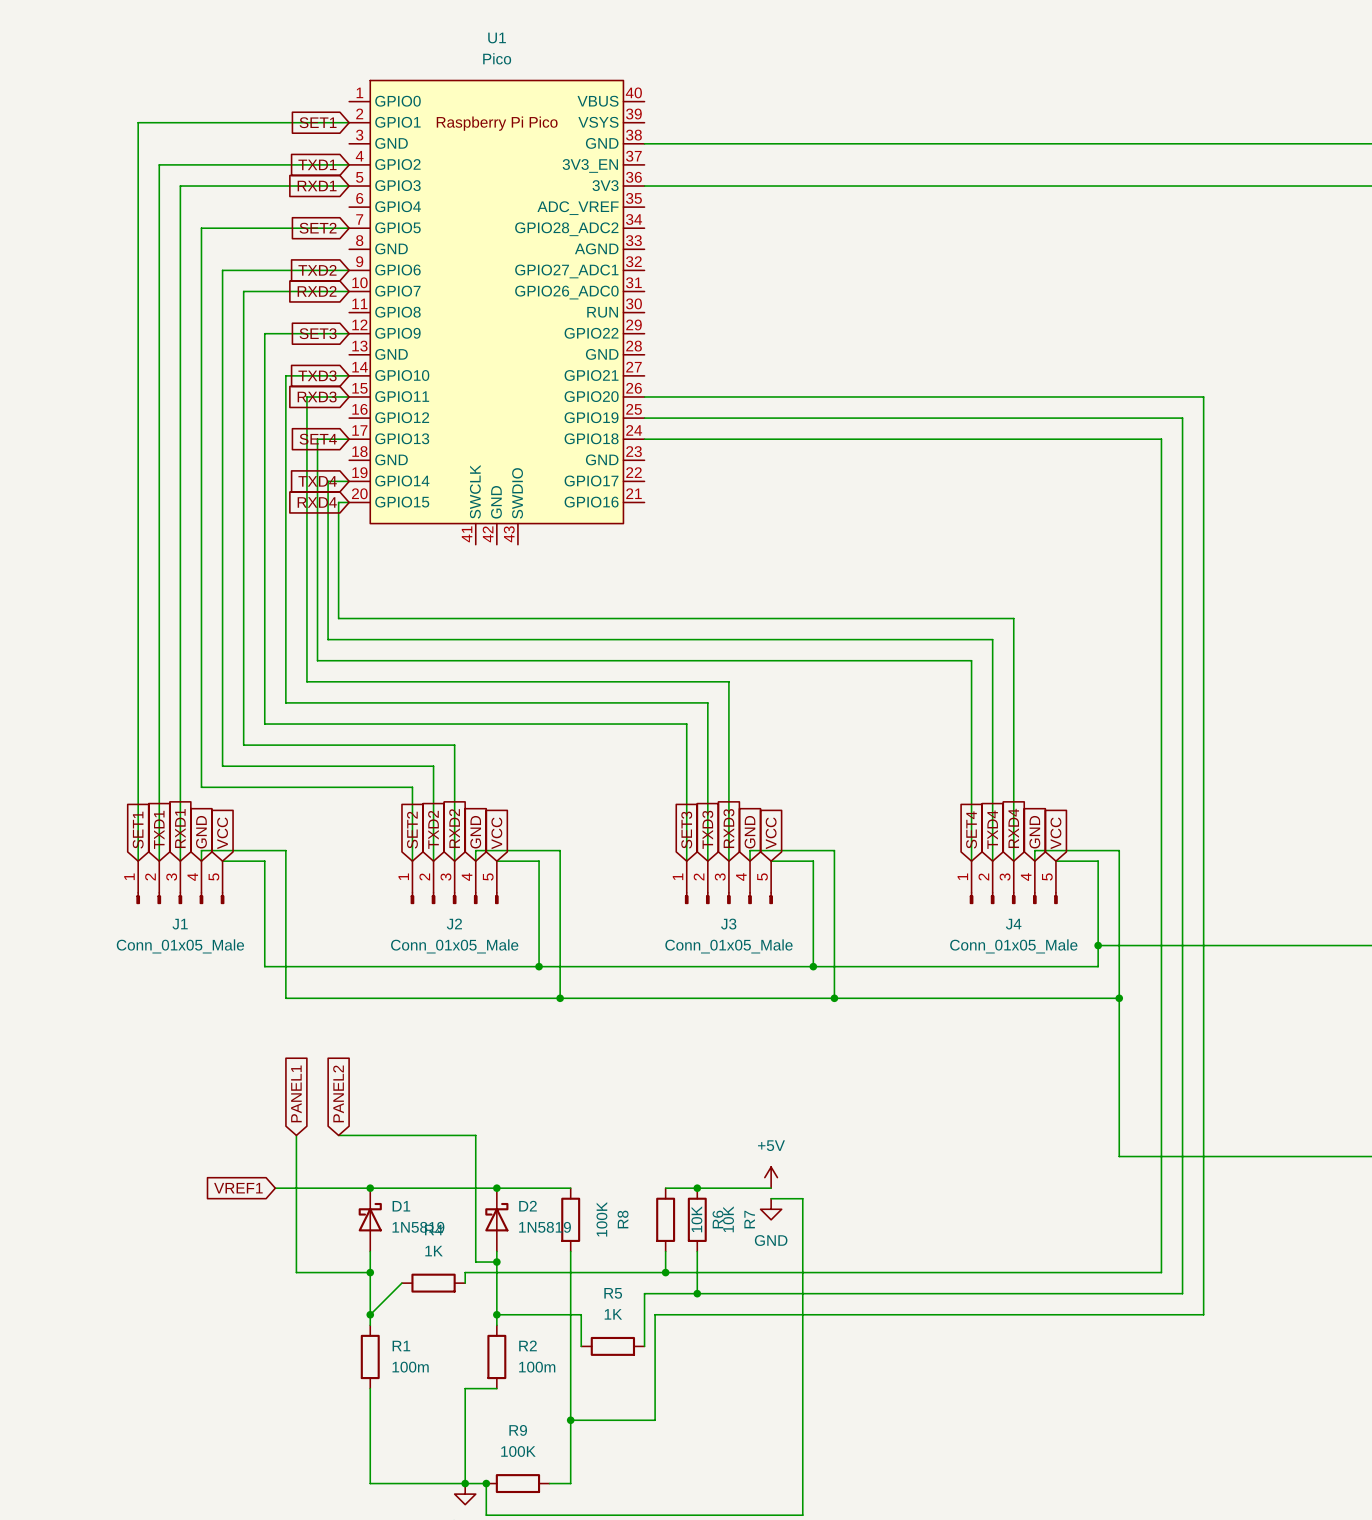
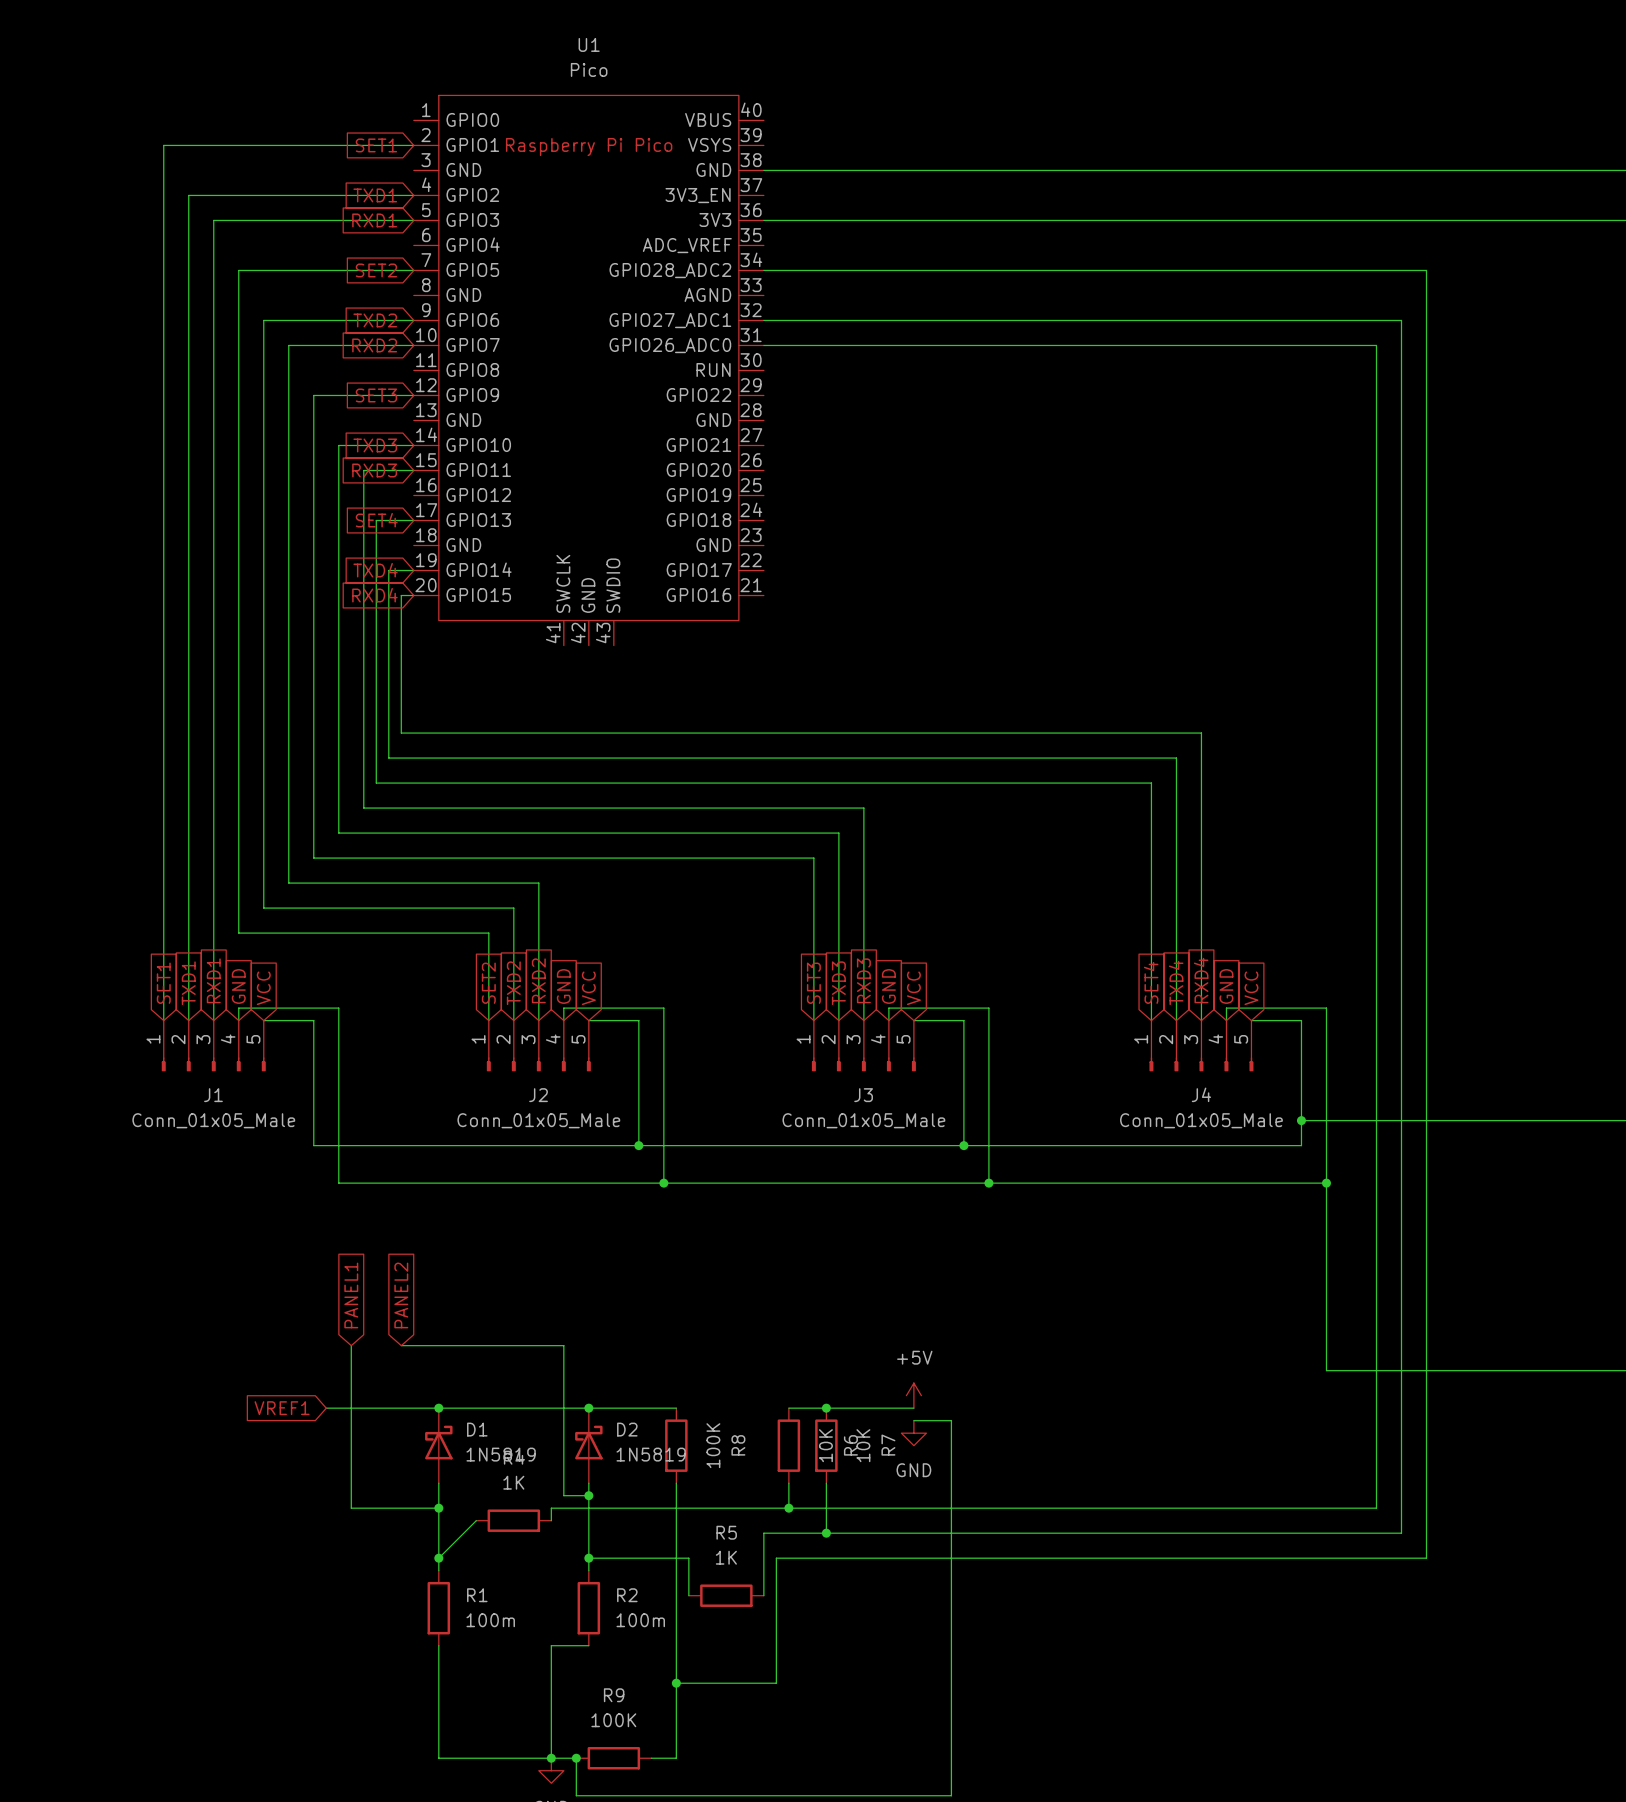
wire: (644, 396) (1203, 396) -> (763, 270) (1426, 270) (1426, 470)
wire: (644, 418) (1182, 418) -> (763, 320) (1401, 320) (1401, 495)
wire: (644, 439) (1161, 439) -> (763, 345) (1376, 345) (1376, 520)

